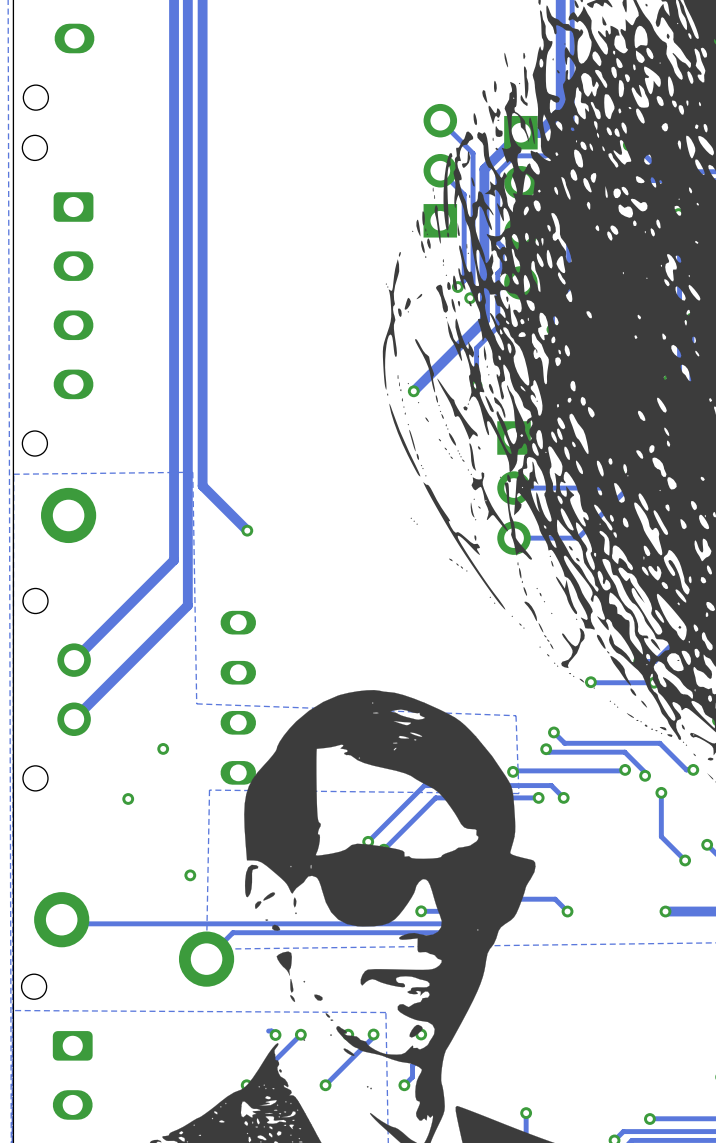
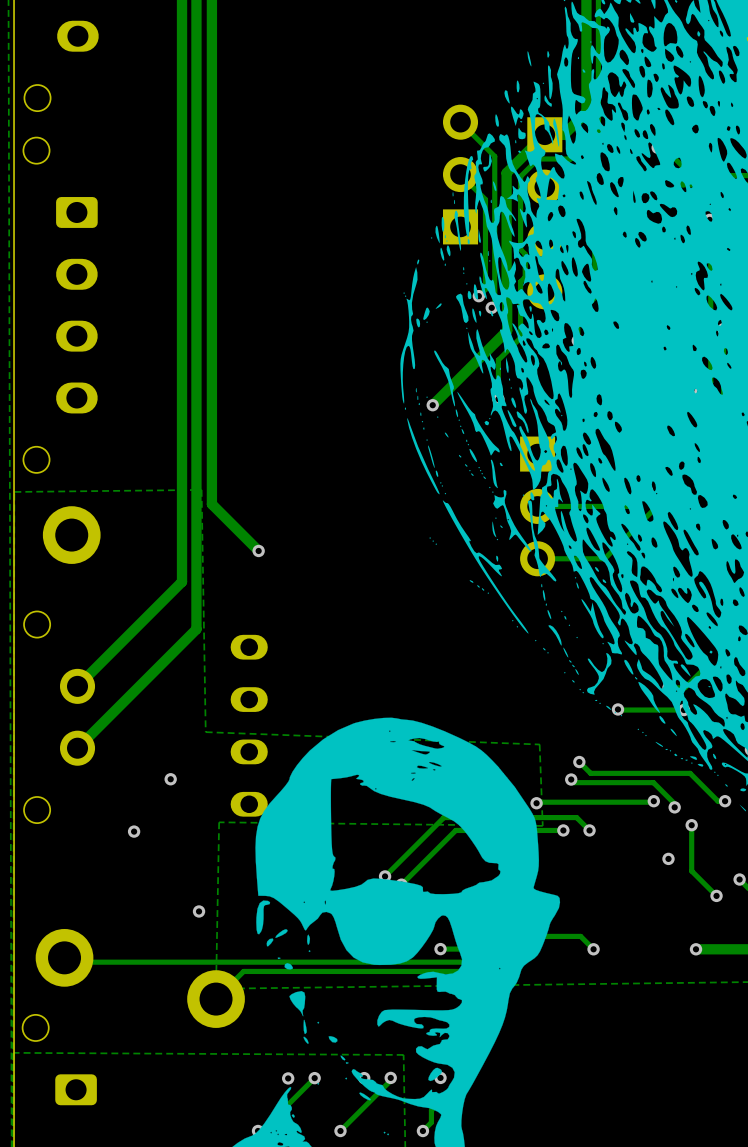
via: none -> (668, 858)
track: (268, 1031) (275, 1035) -> none

